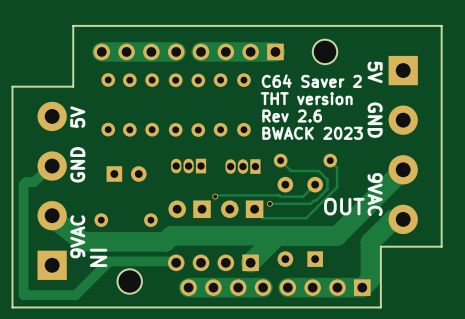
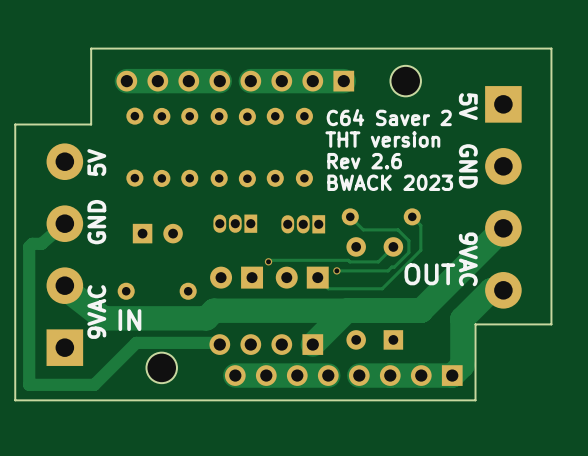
text rotation: 0° (98, 257) -> 90° counterclockwise (129, 320)

